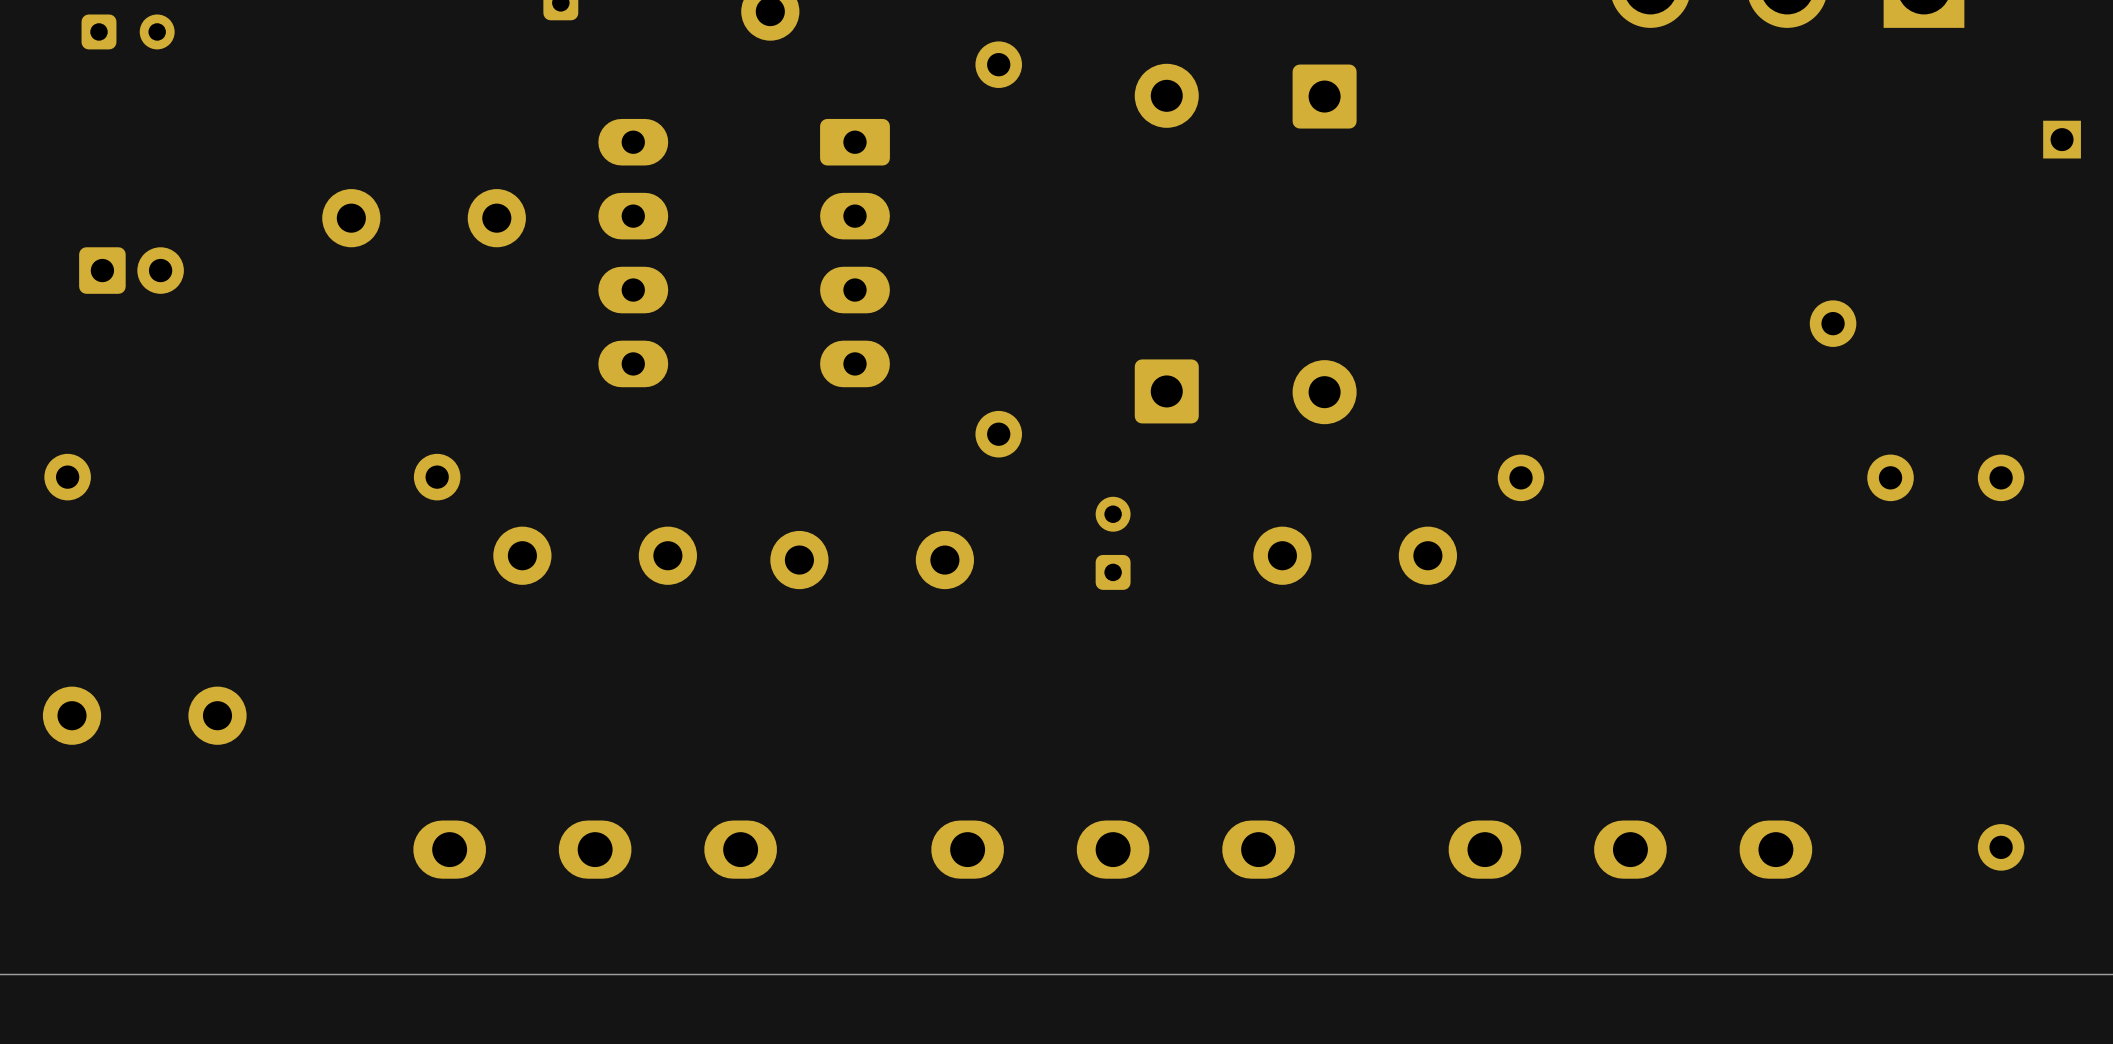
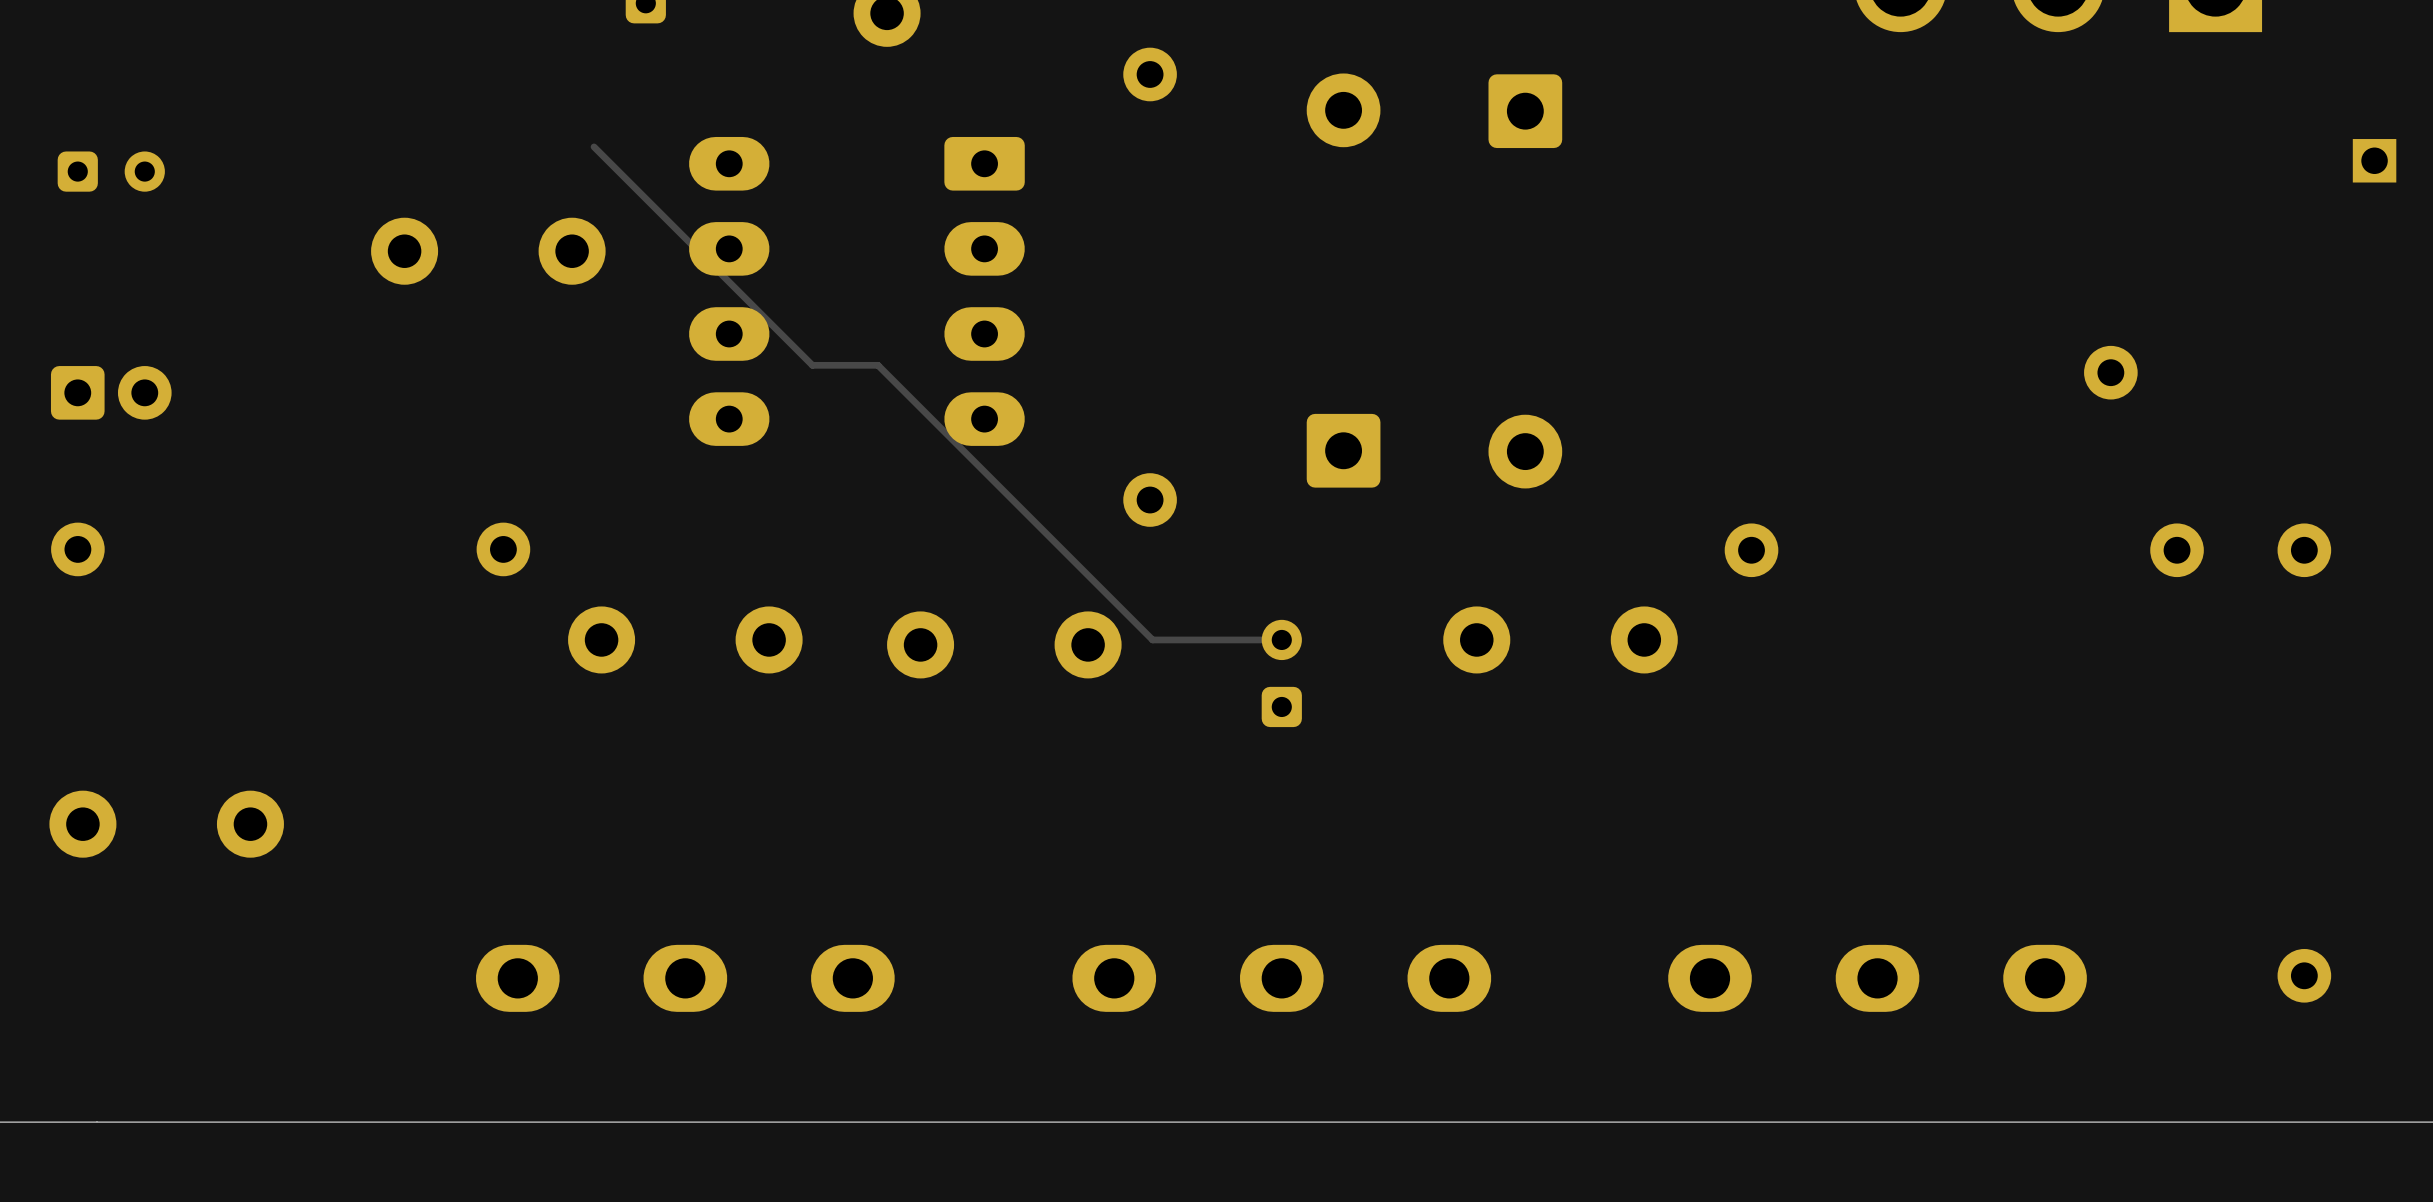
part: (128, 31) -> none
track: none -> (594, 146) (812, 365) (878, 365) (1152, 639) (1281, 639)
part: none -> (111, 171)
part position: (131, 270) -> (111, 392)
part position: (1113, 543) -> (1281, 673)

